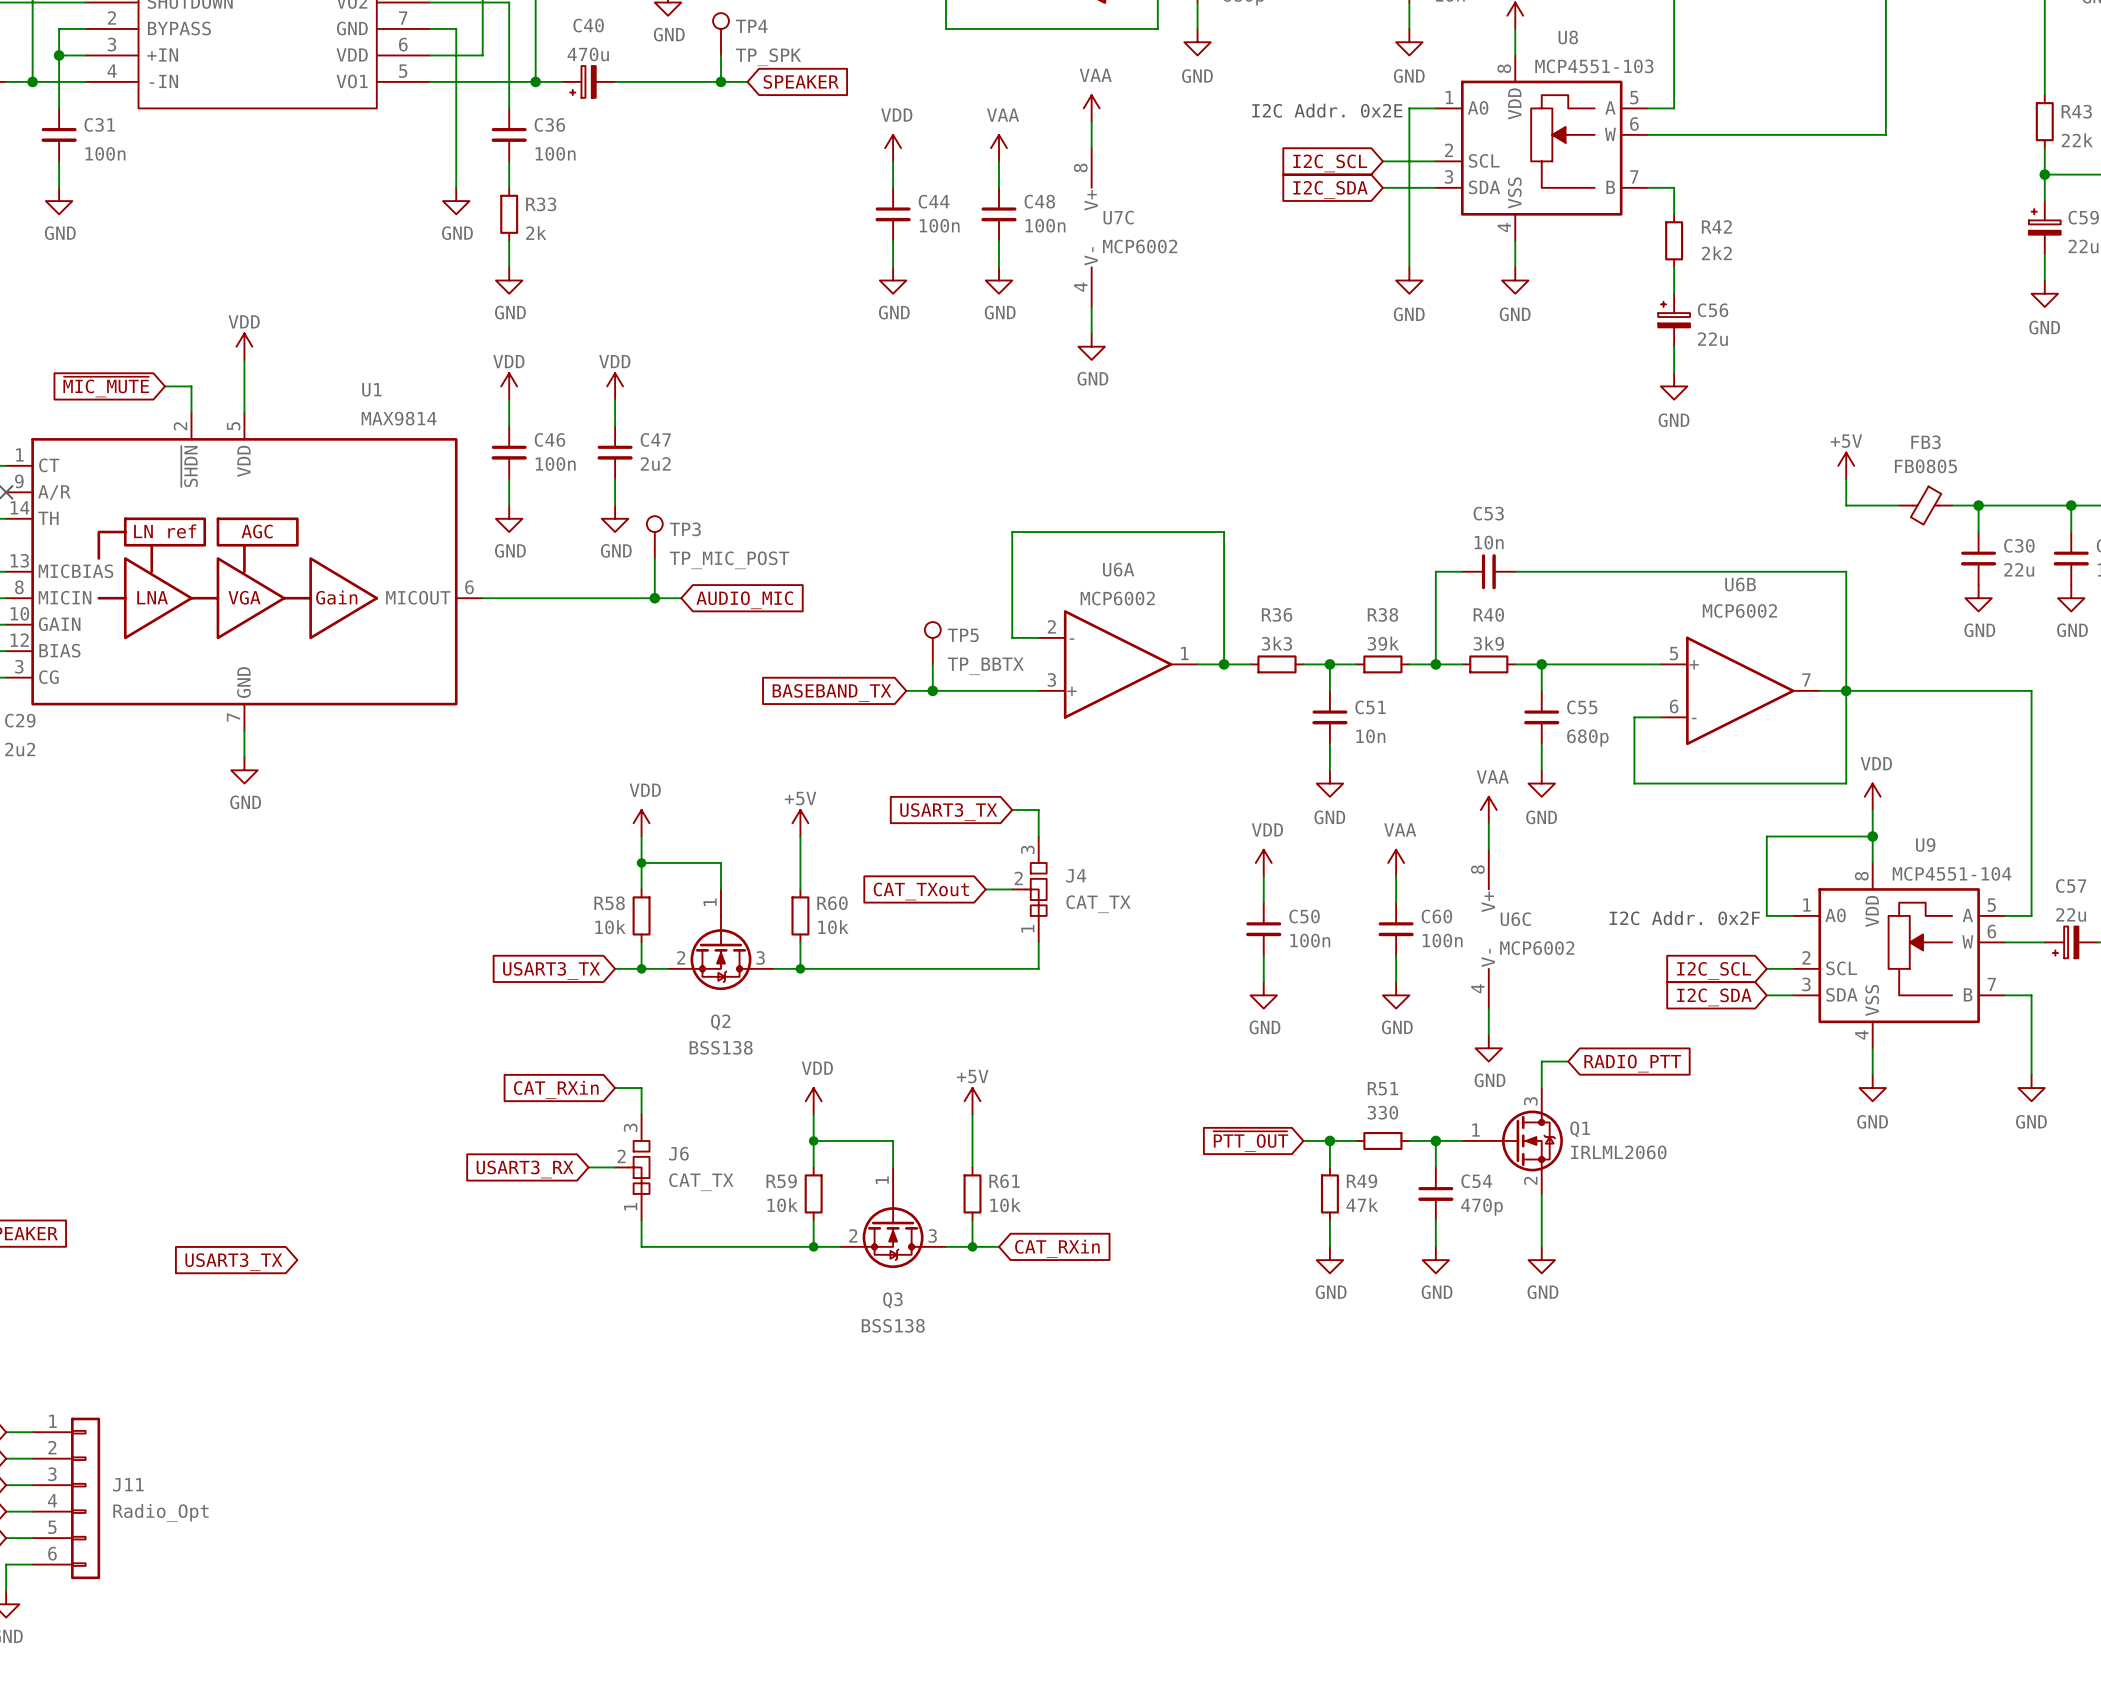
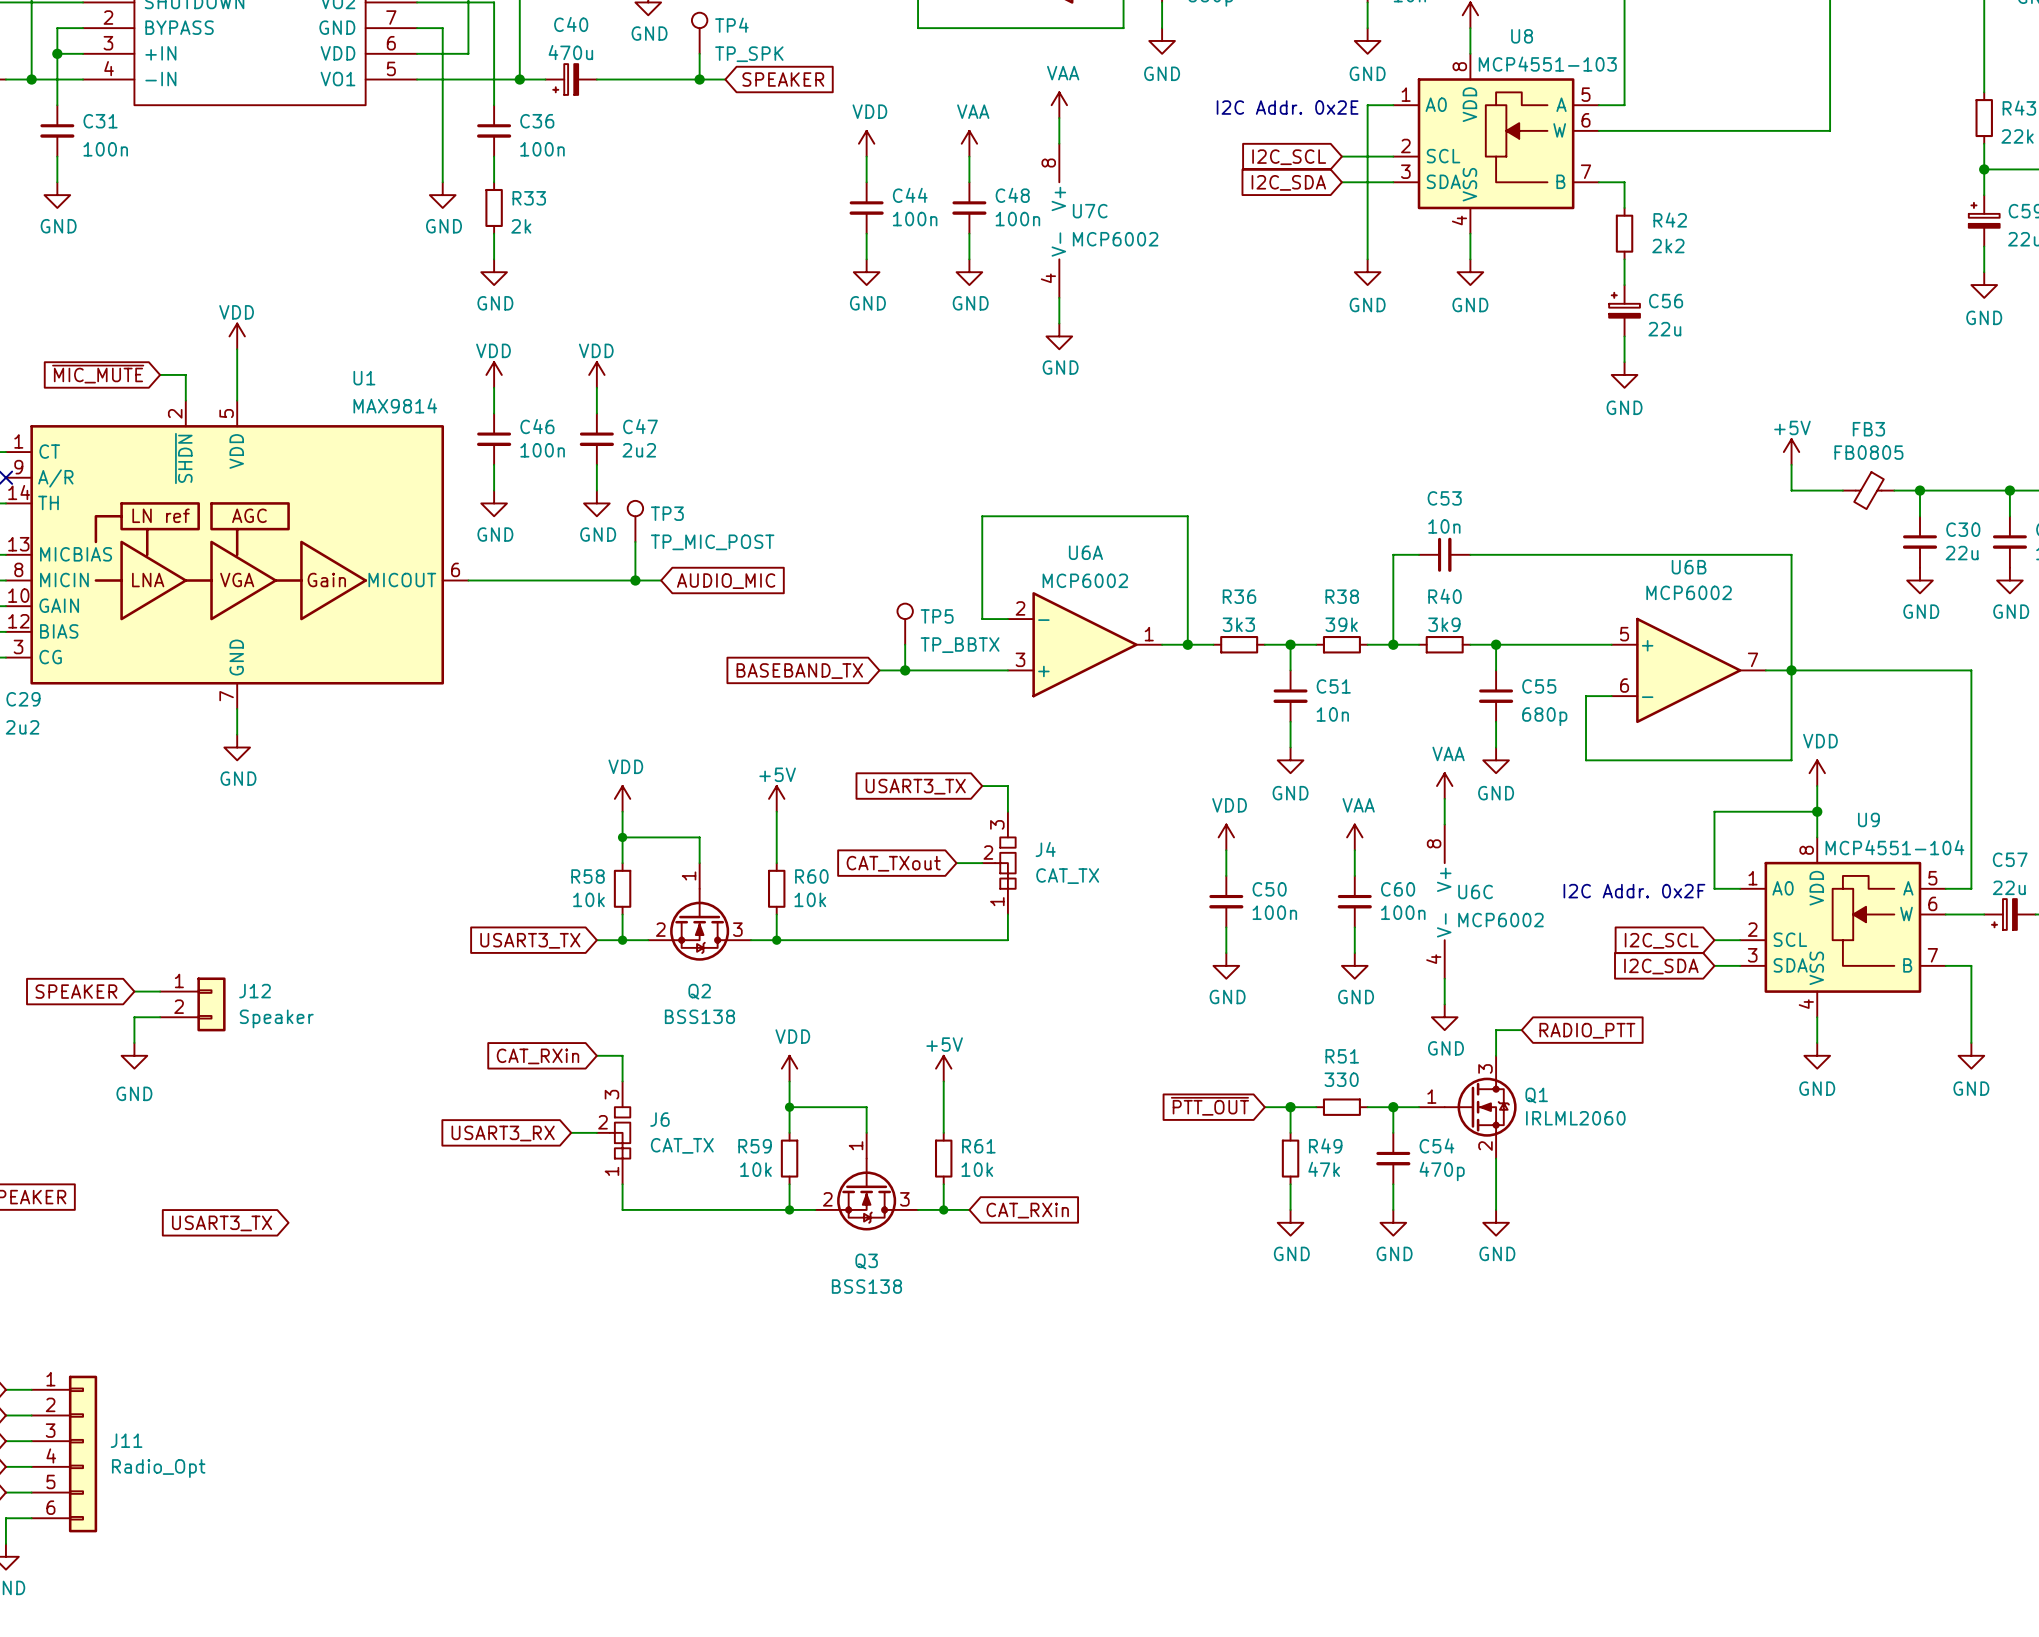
global label: none -> SPEAKER (76, 991)
wire: none -> (134, 991) (160, 991)
J12: none -> Speaker (192, 1004)
wire: none -> (160, 1017) (134, 1017) (134, 1042)
power symbol: none -> GND (134, 1055)

